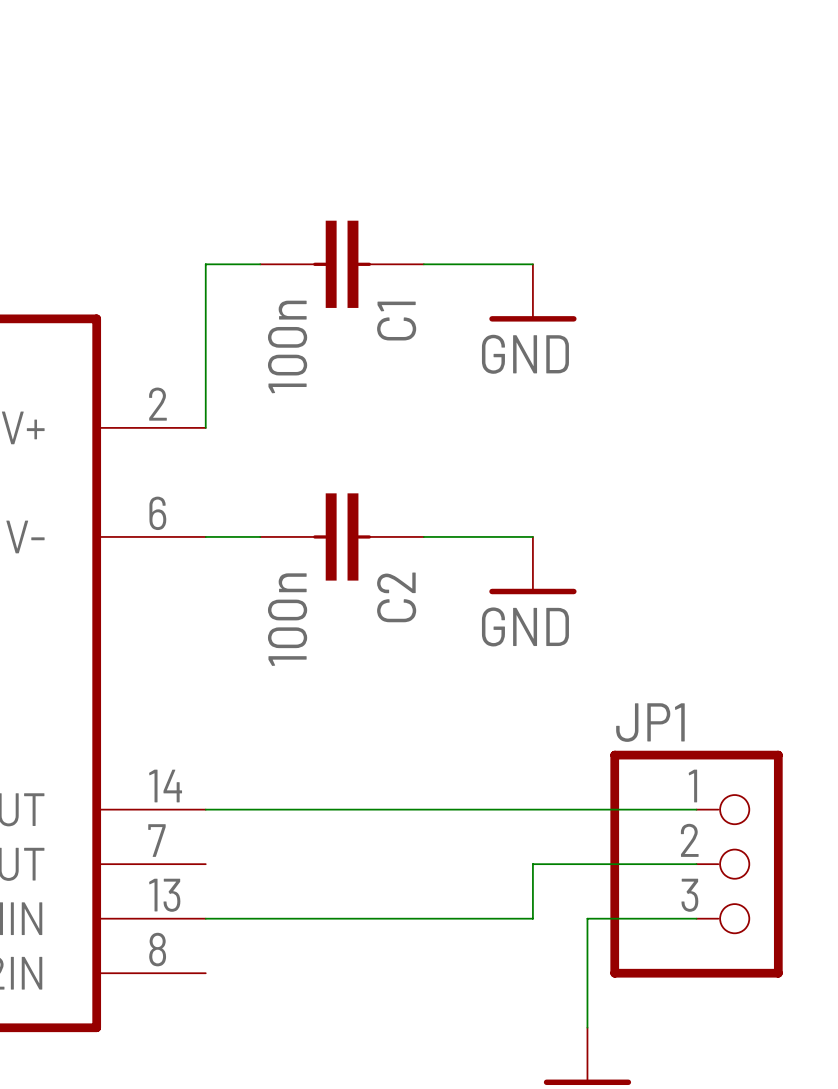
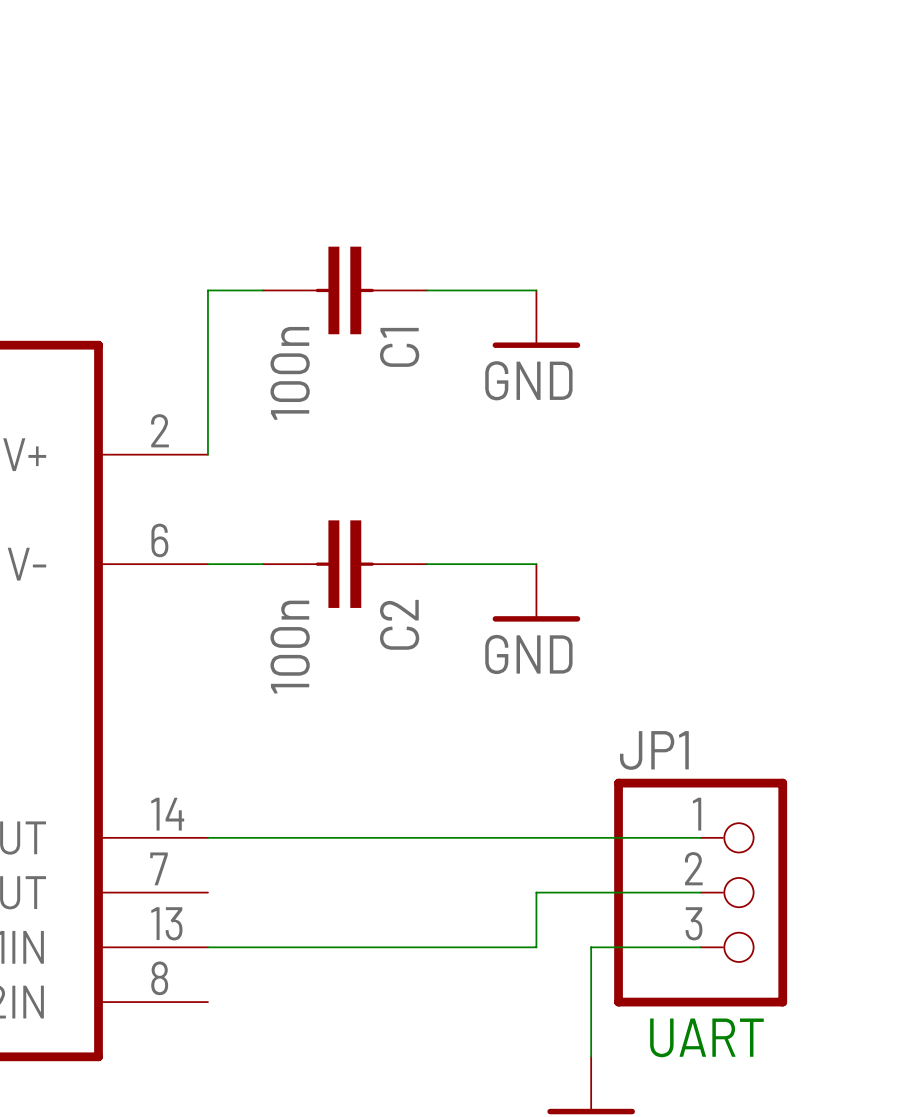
text: none -> UART (706, 1037)

